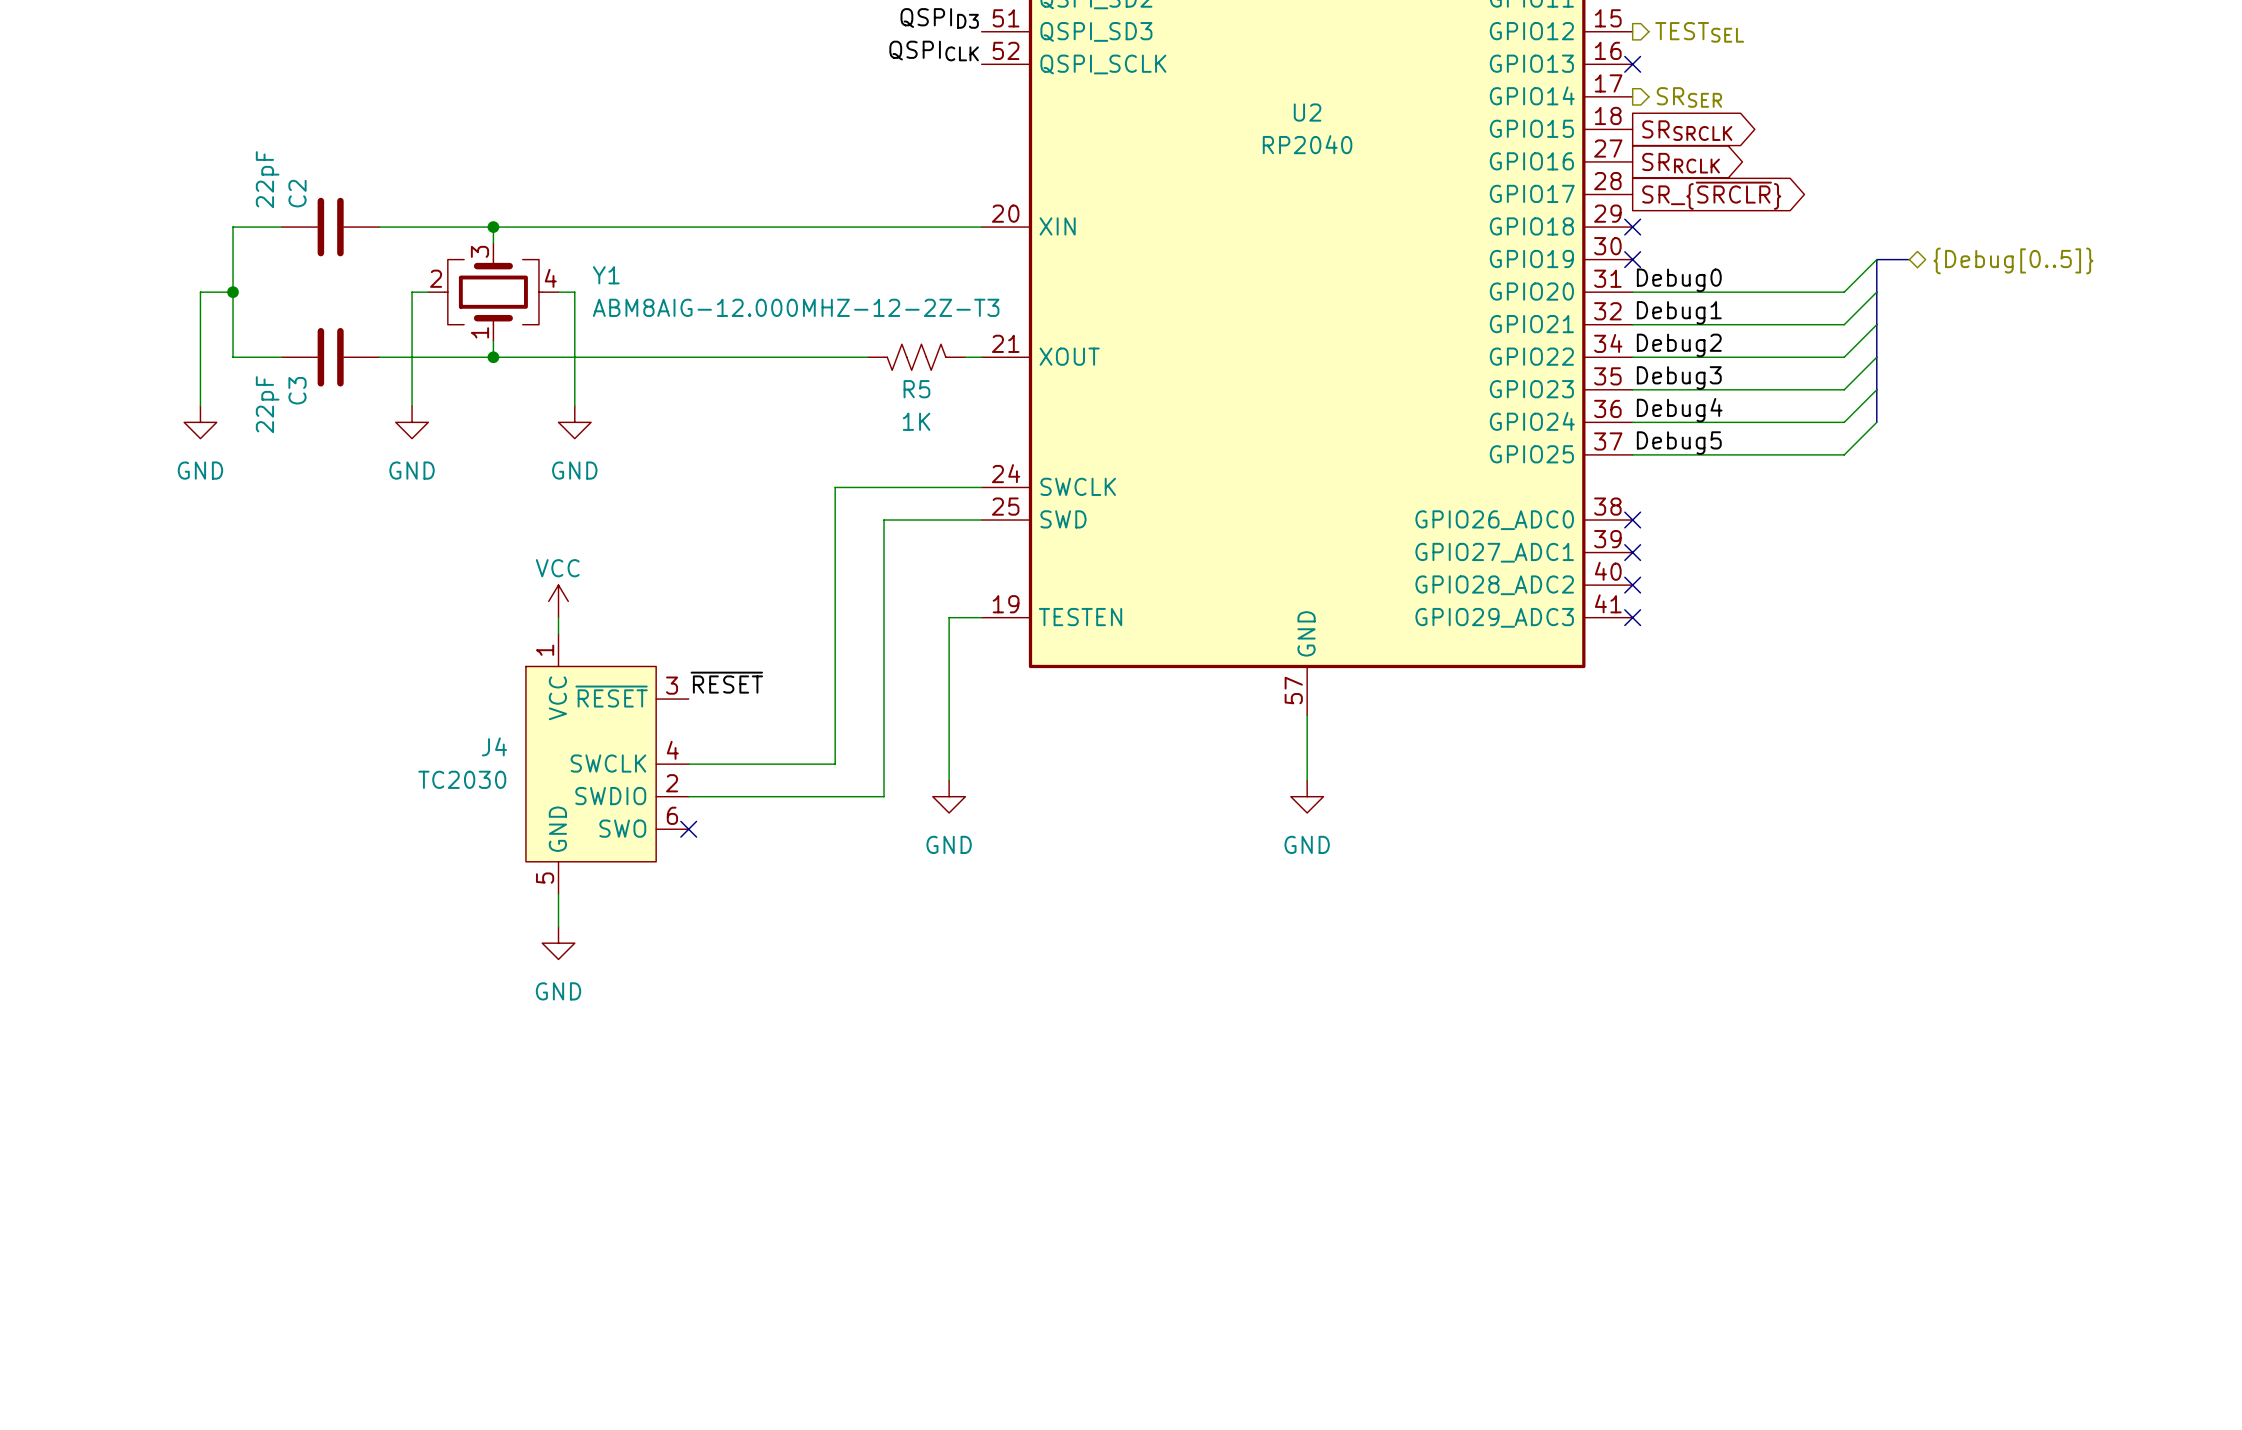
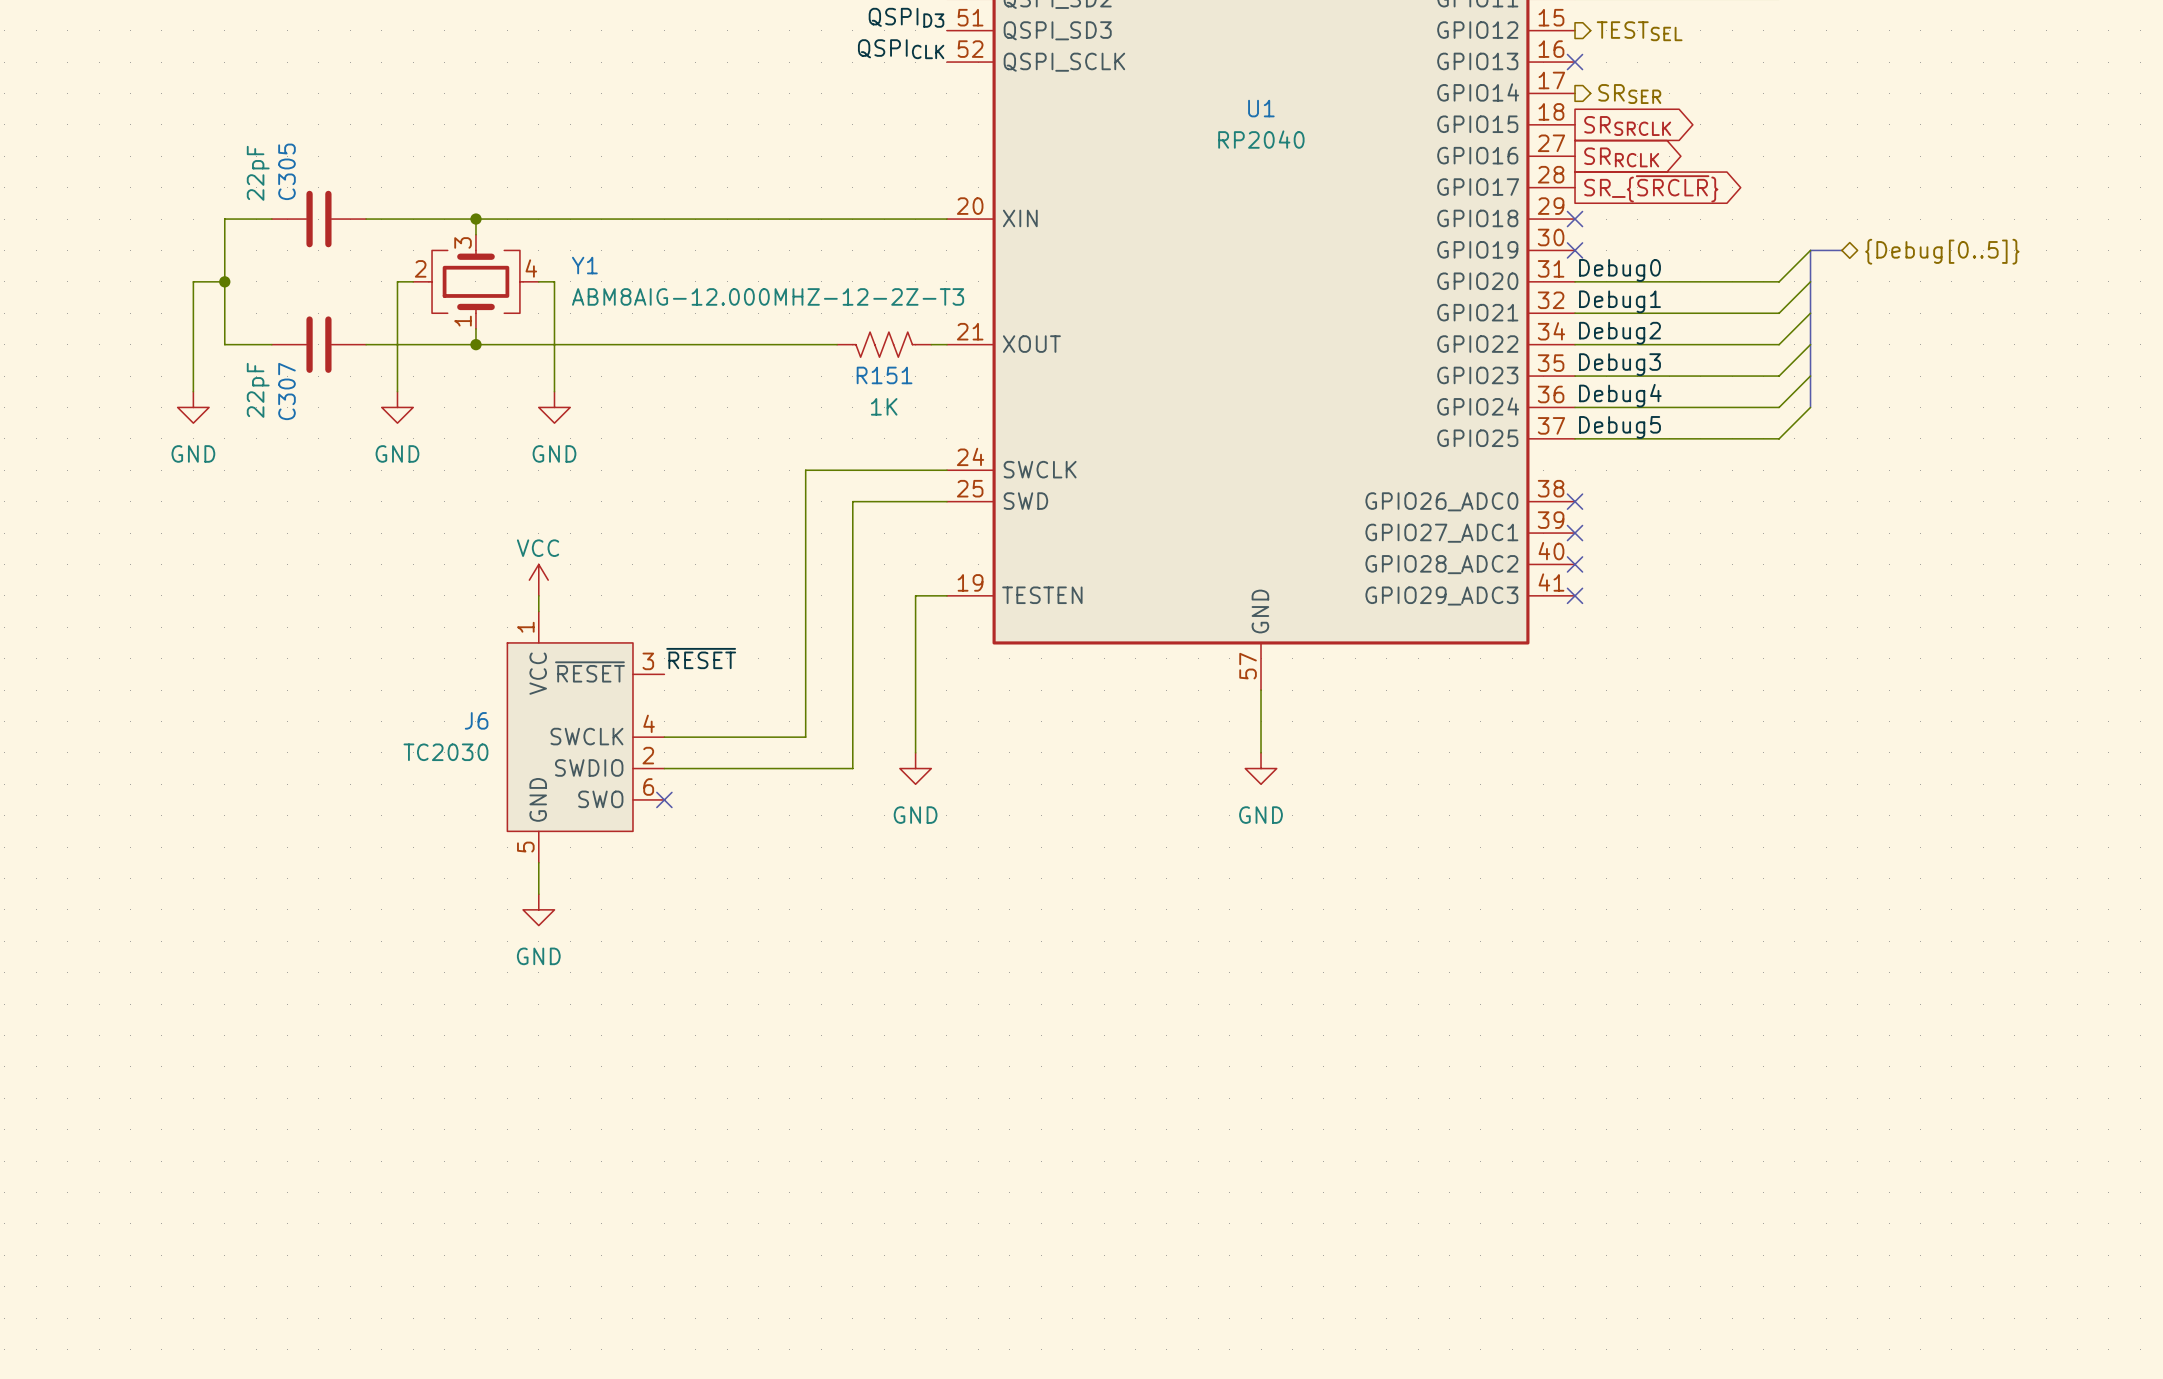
U2 name: U2 (1307, 112) -> U1 (1261, 108)
C2 name: C2 (297, 193) -> C305 (286, 171)
R5 name: R5 (916, 389) -> R151 (884, 375)
C3 name: C3 (297, 390) -> C307 (286, 391)
J4 name: J4 (494, 746) -> J6 (476, 720)

